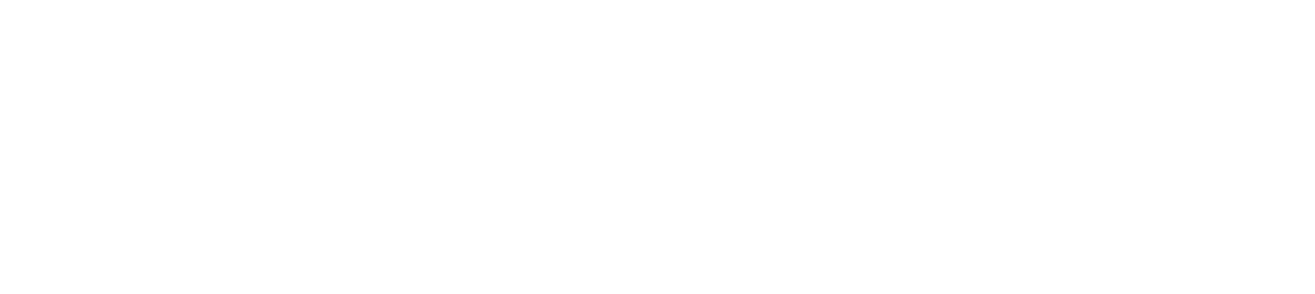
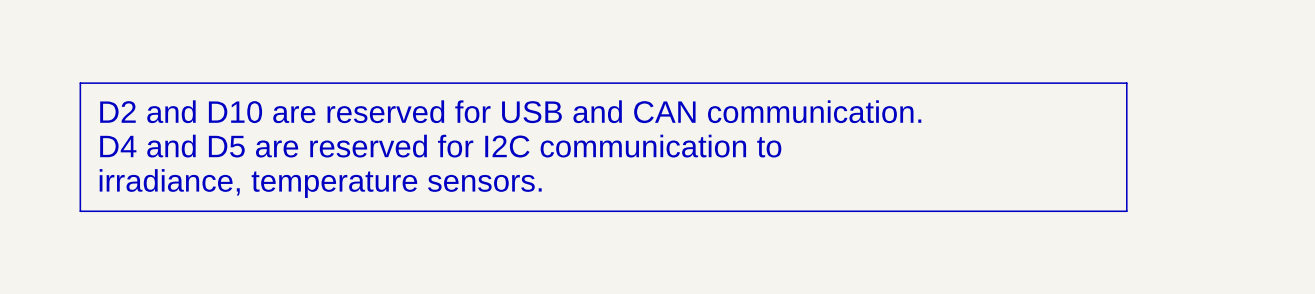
line: none -> (80, 83) (1126, 83) (1126, 211) (80, 211) (80, 83)
text: none -> D2 and D10 are reserved for USB and CAN communication. (510, 111)
text: none -> D4 and D5 are reserved for I2C communication to (440, 146)
text: none -> irradiance, temperature sensors. (320, 183)

